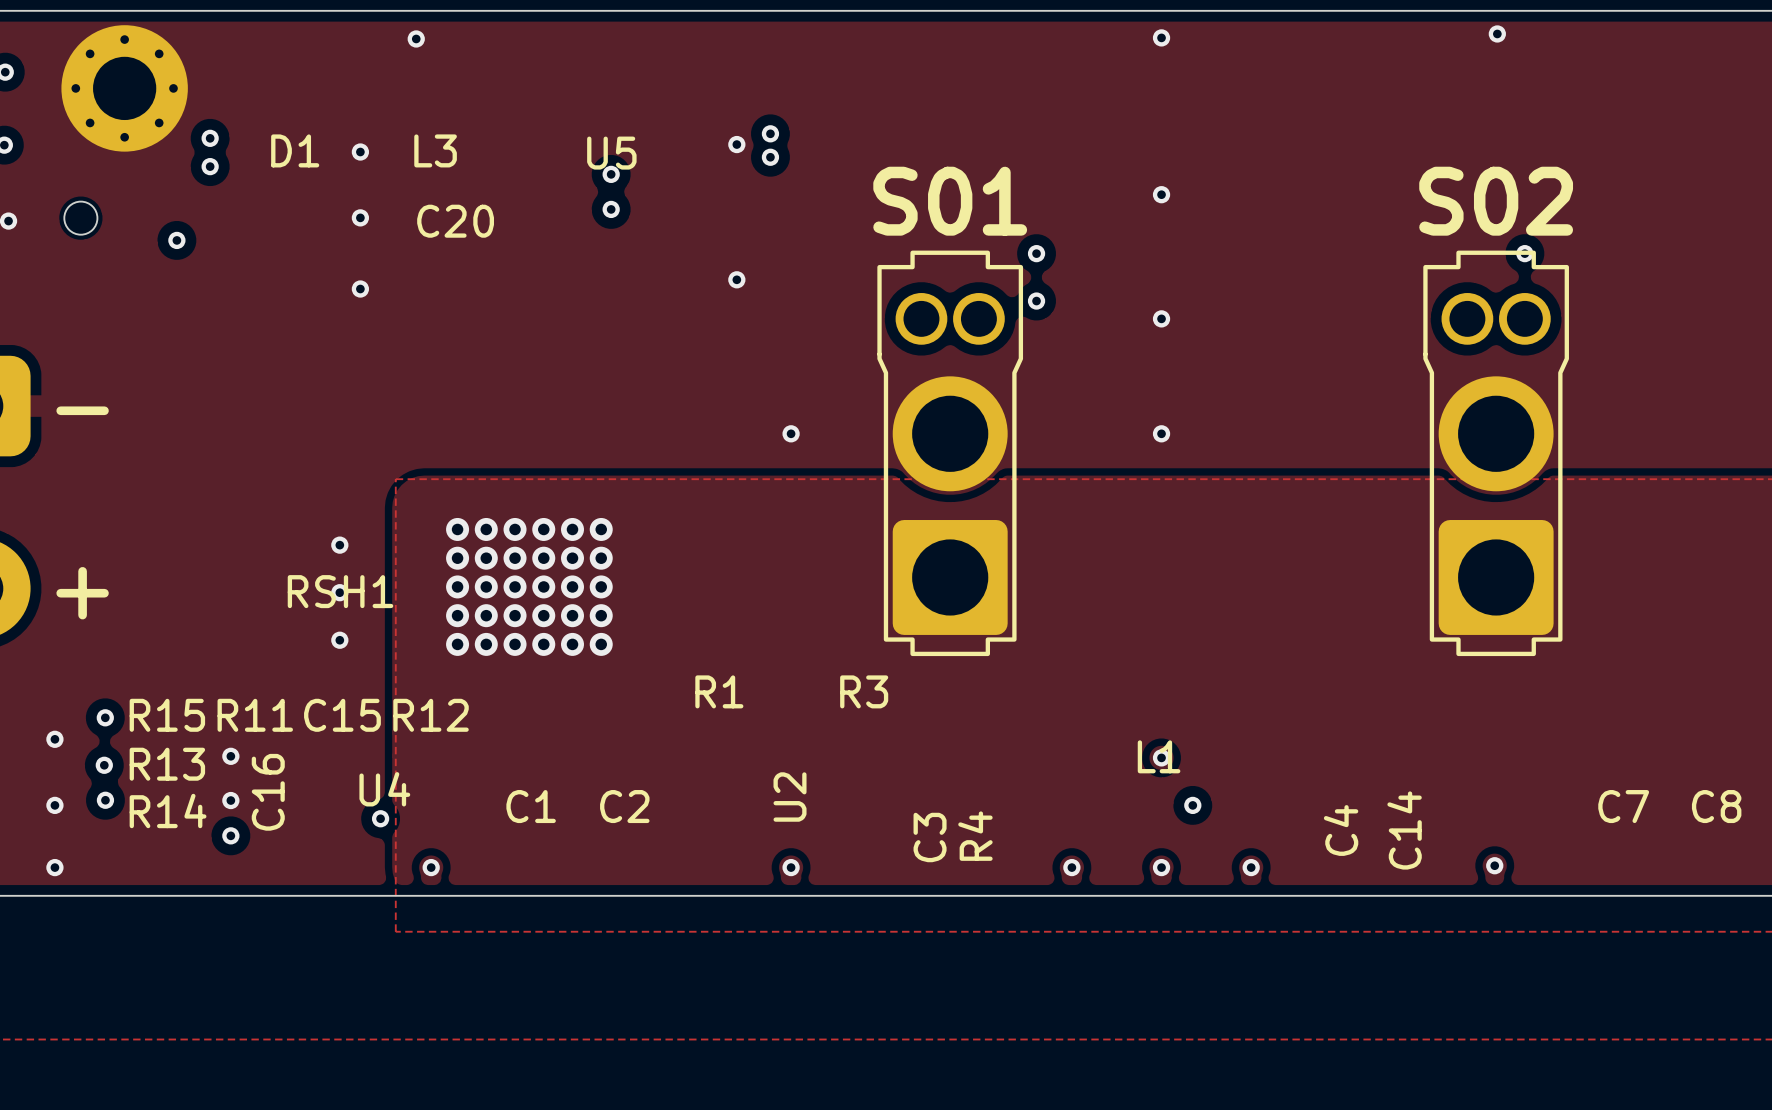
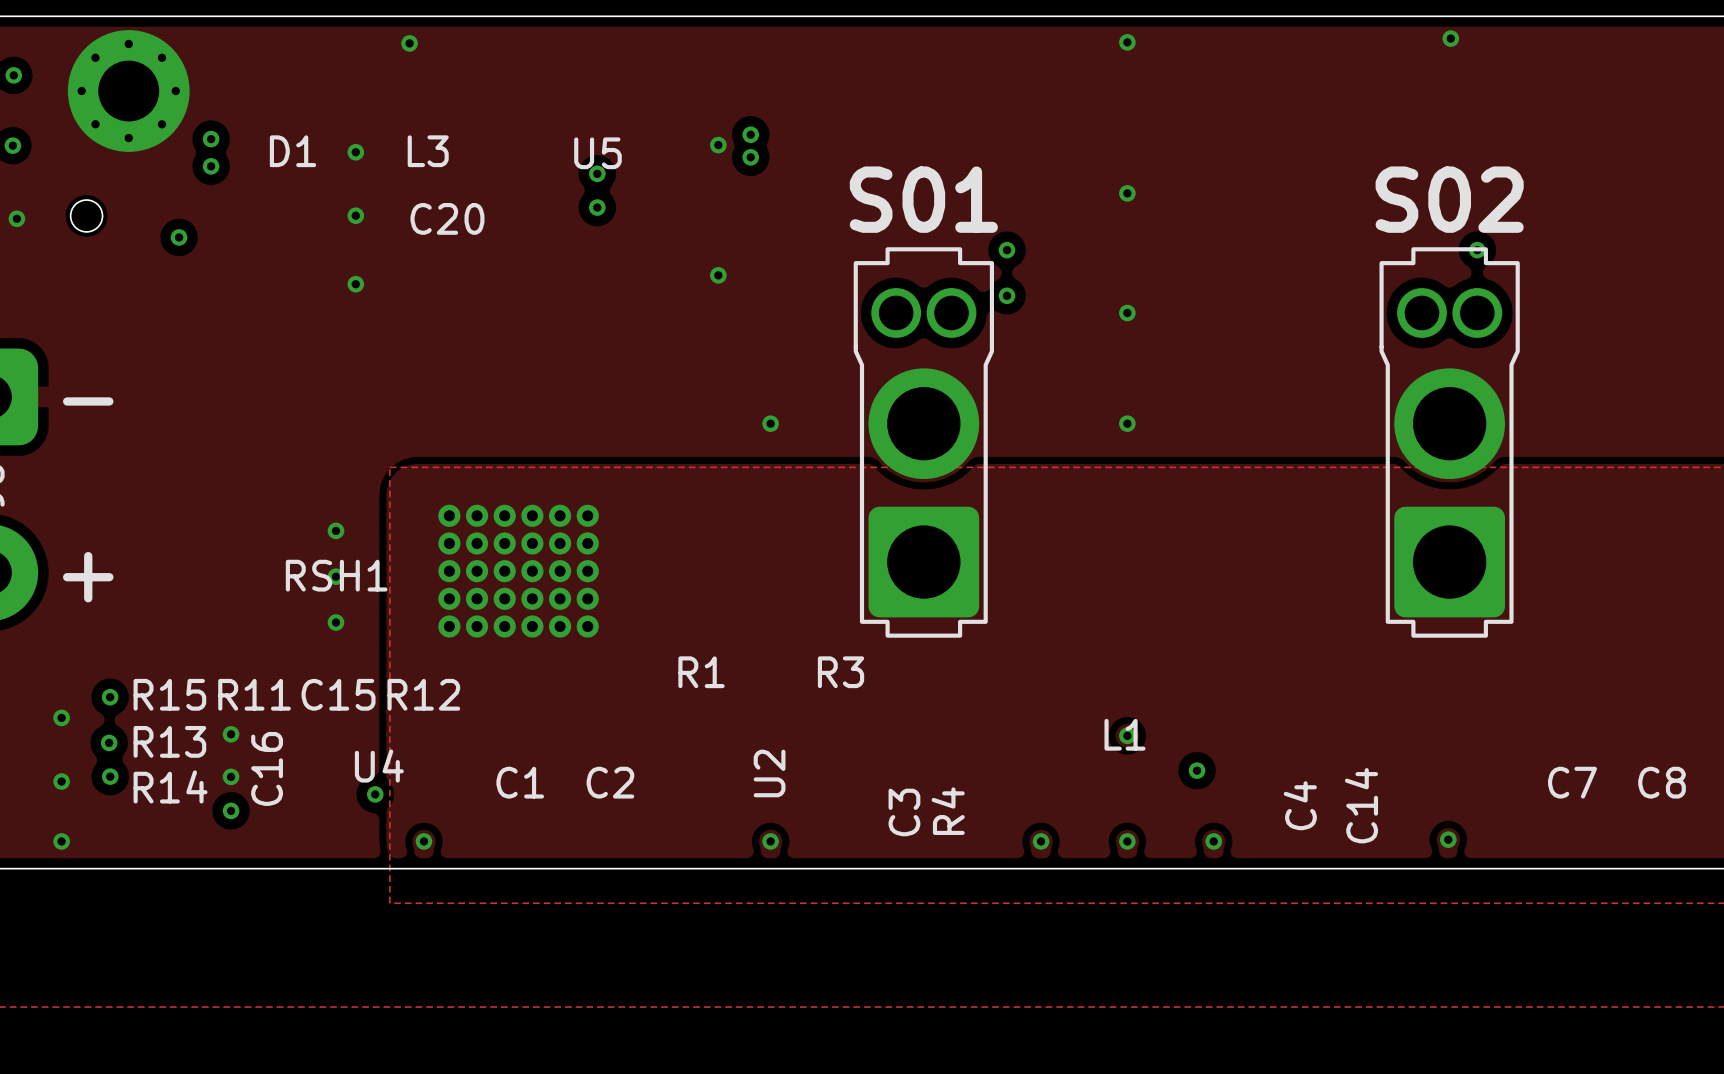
via position: (1192, 805) -> (1197, 770)

